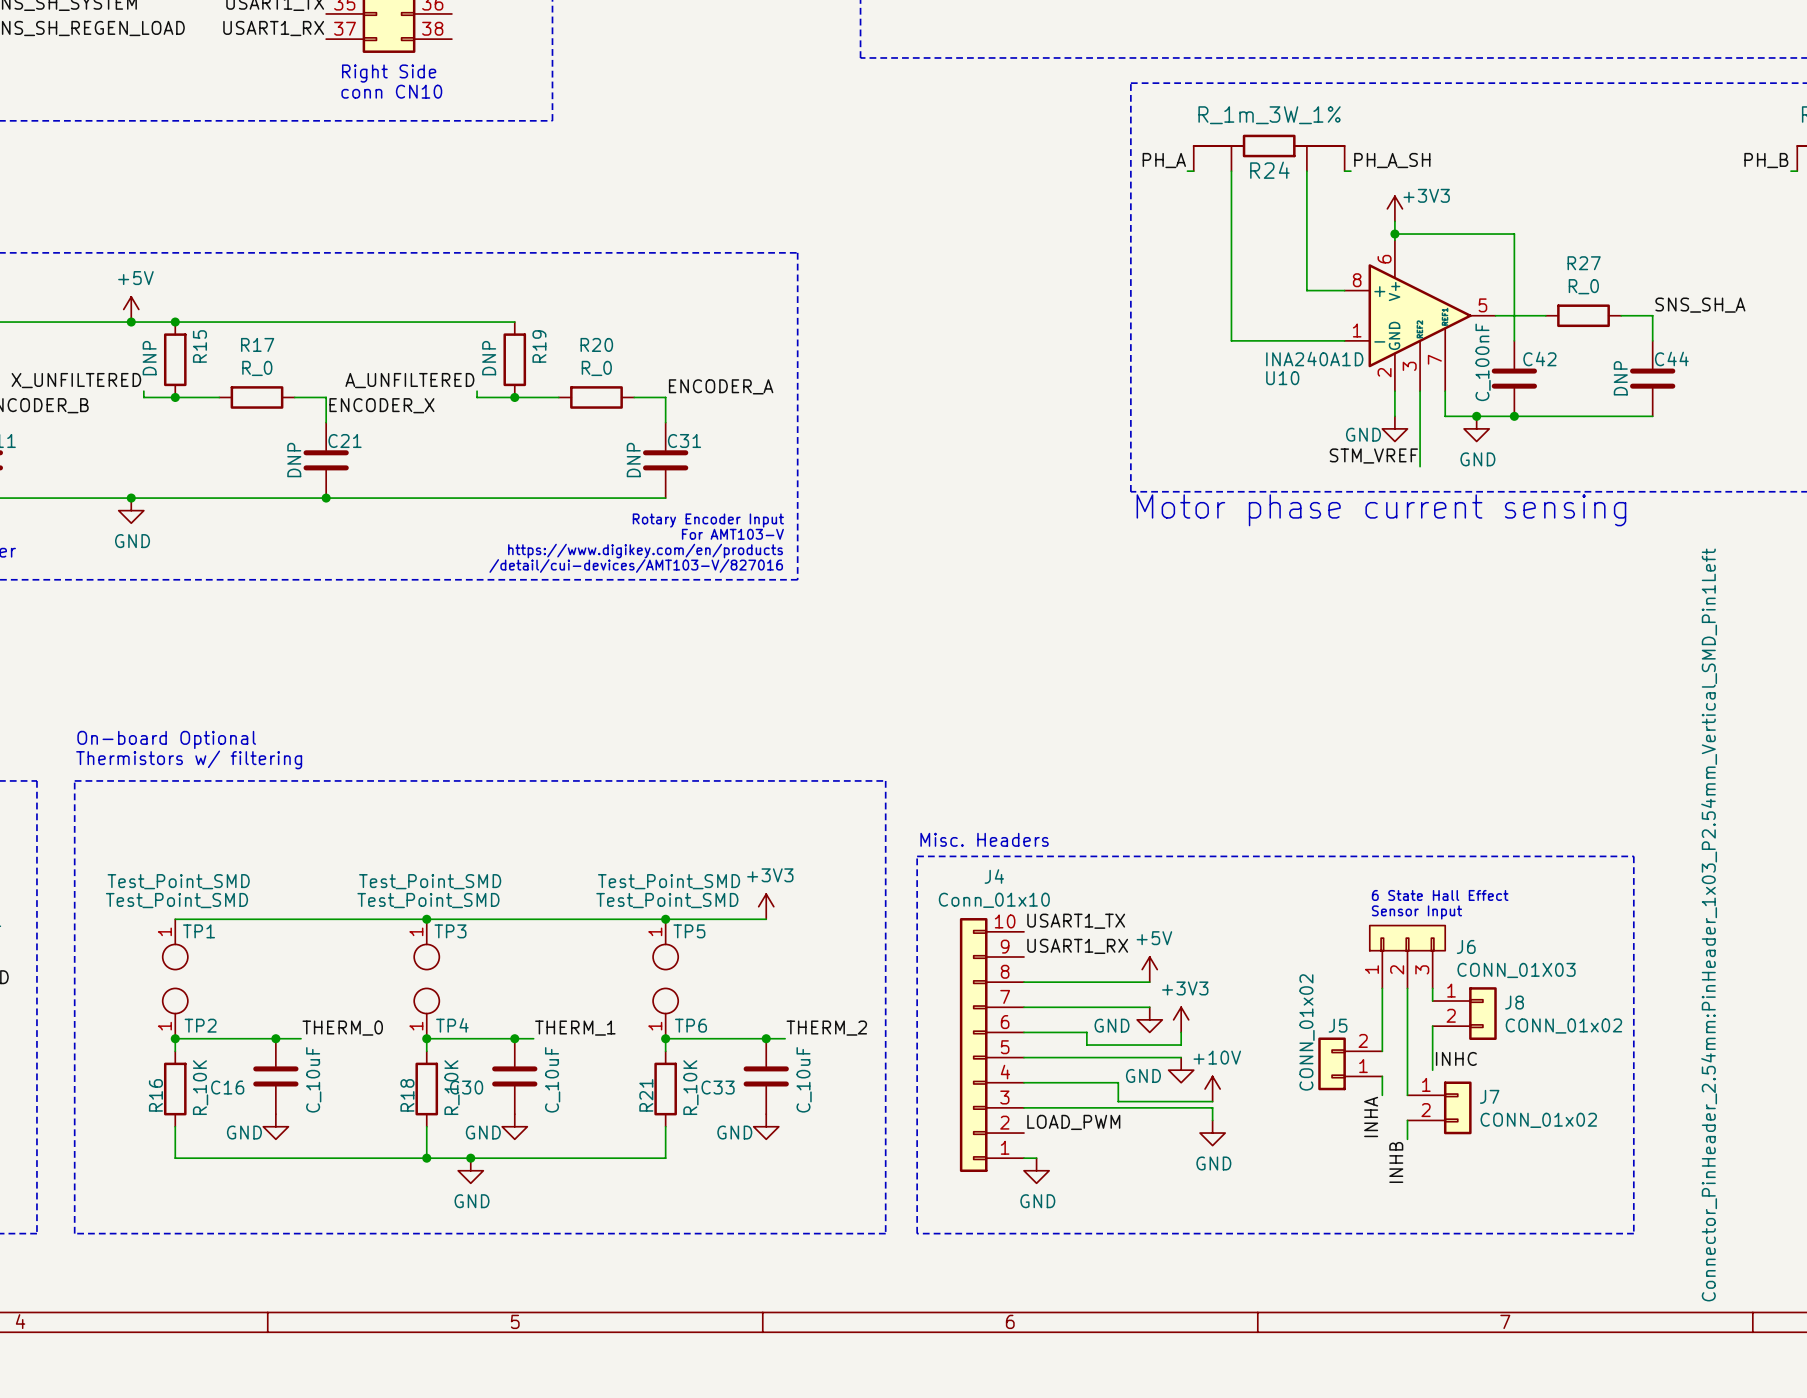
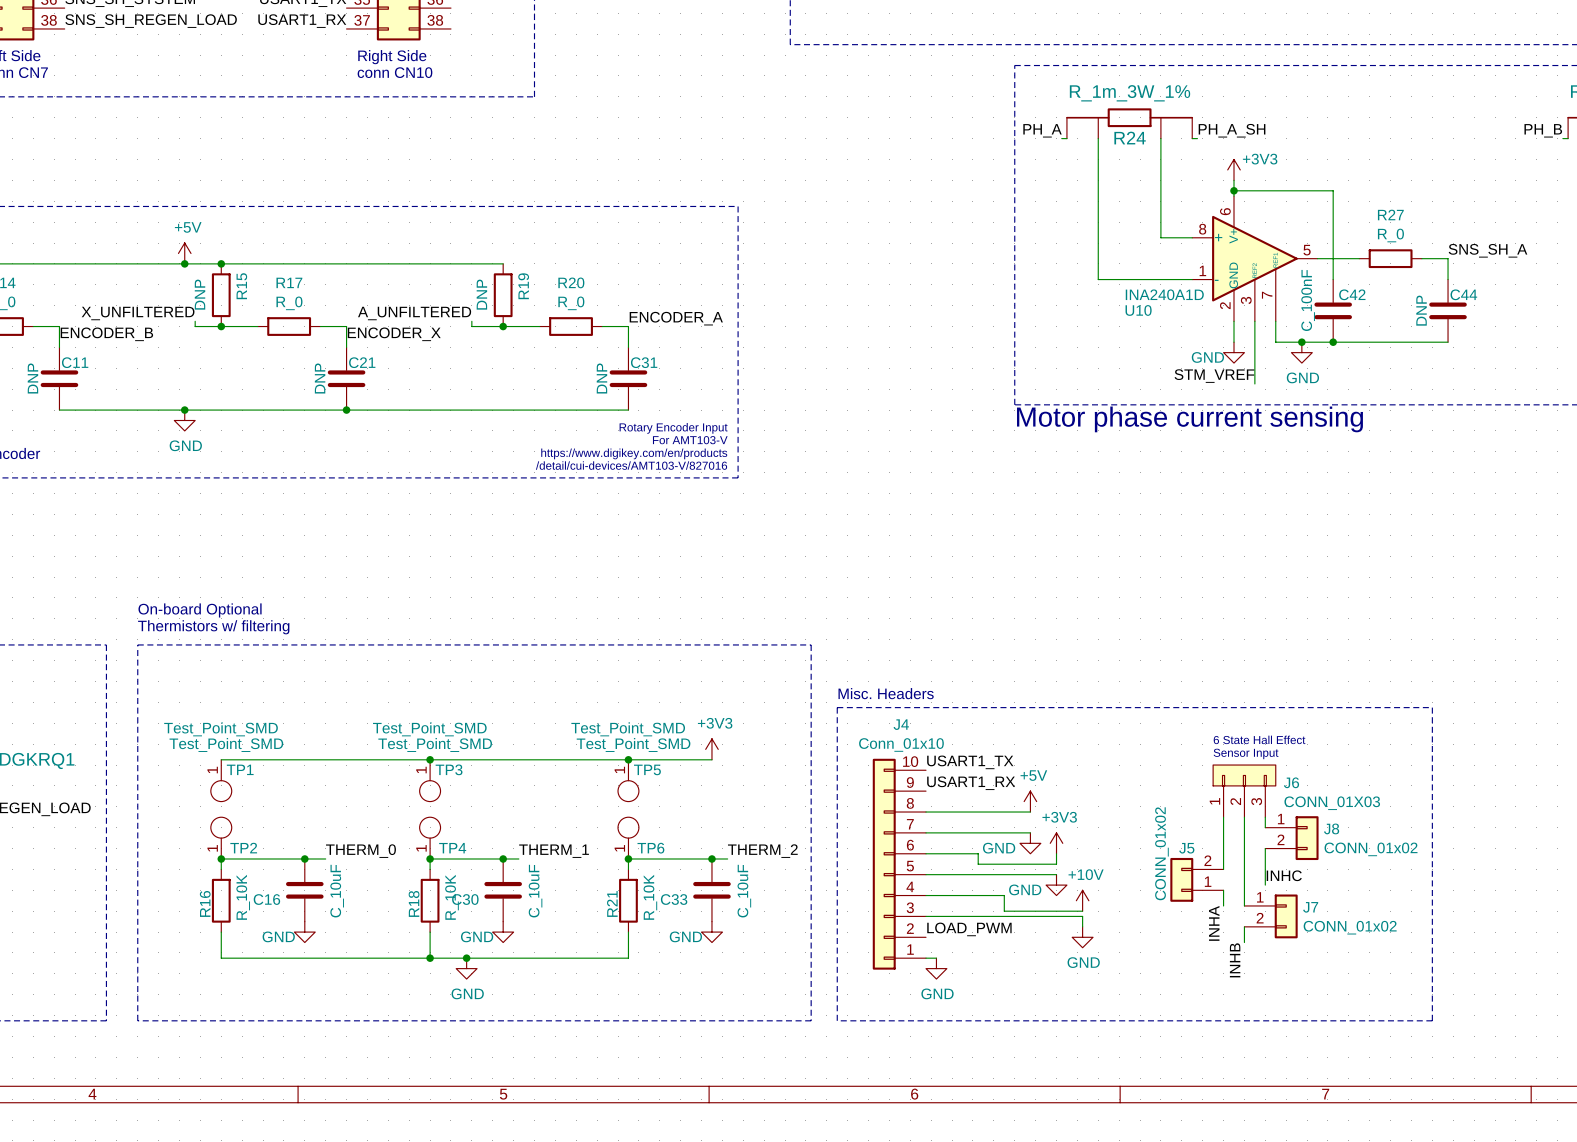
J6 text: Connector_PinHeader_2.54mm:PinHeader_1x03_P2.54mm_Vertical_SMD_Pin1Left (1709, 924) -> none

